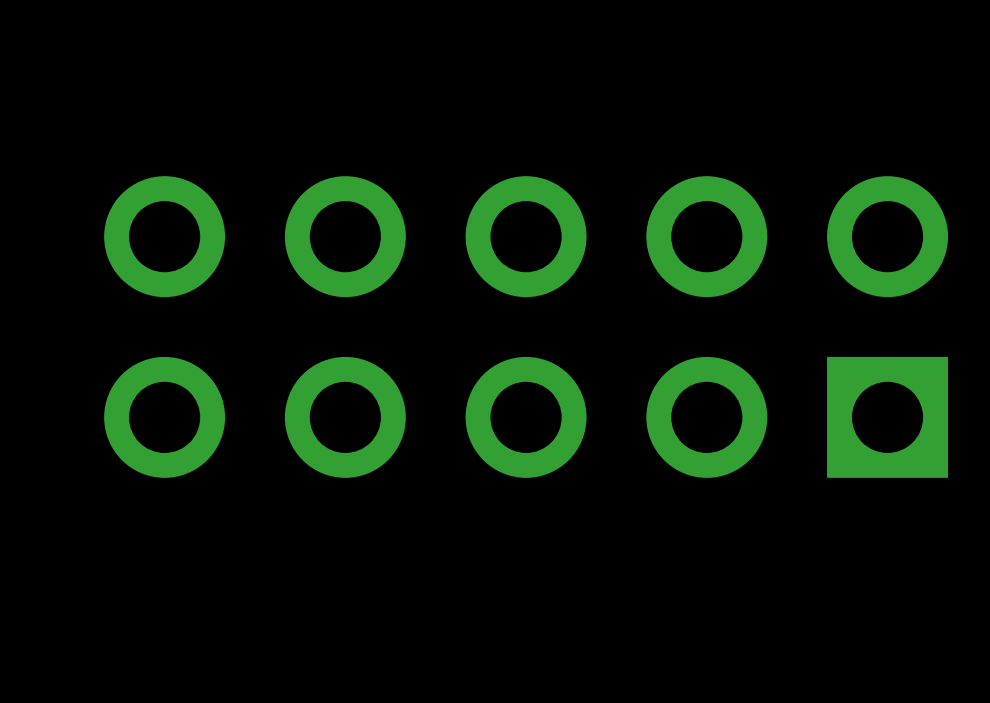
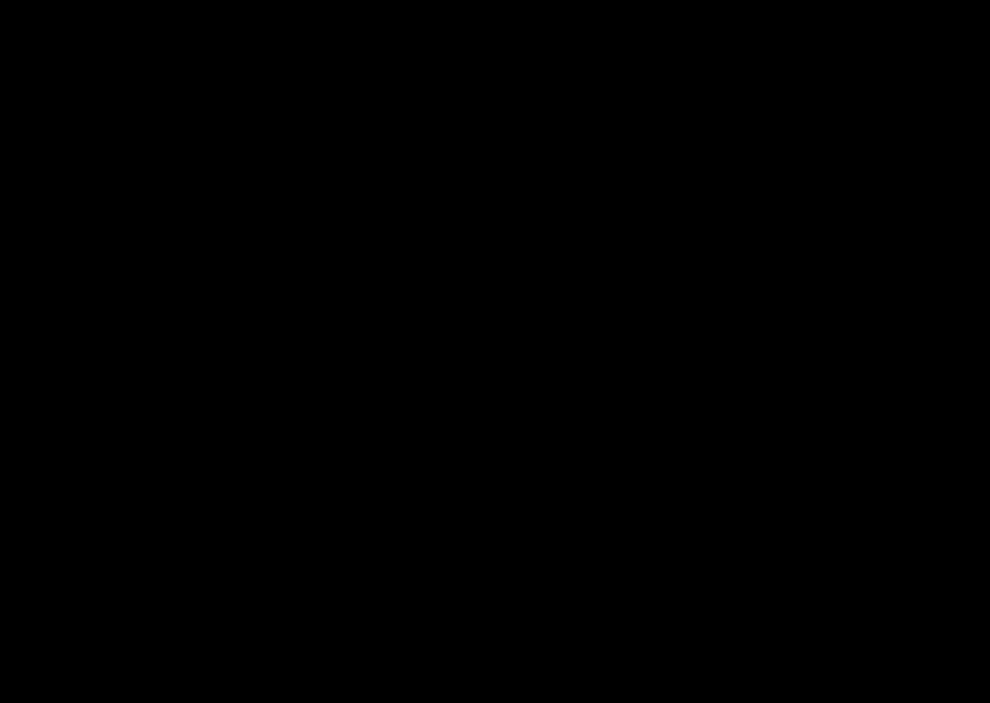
part: (526, 327) -> none

